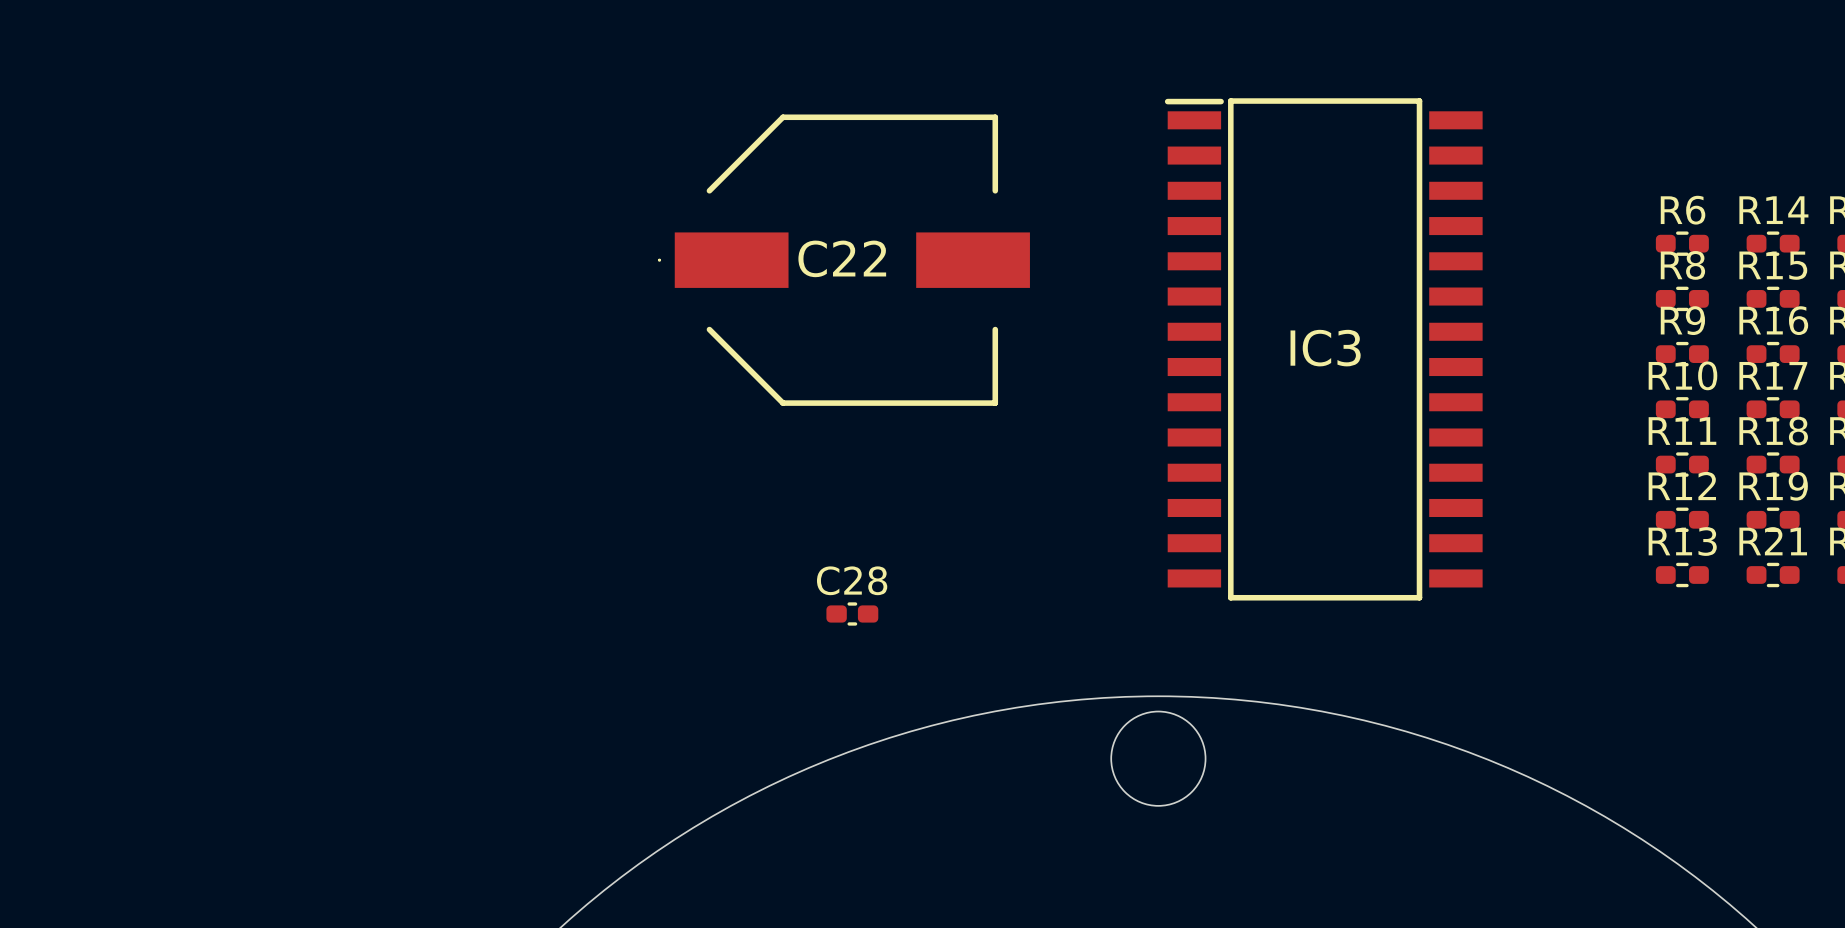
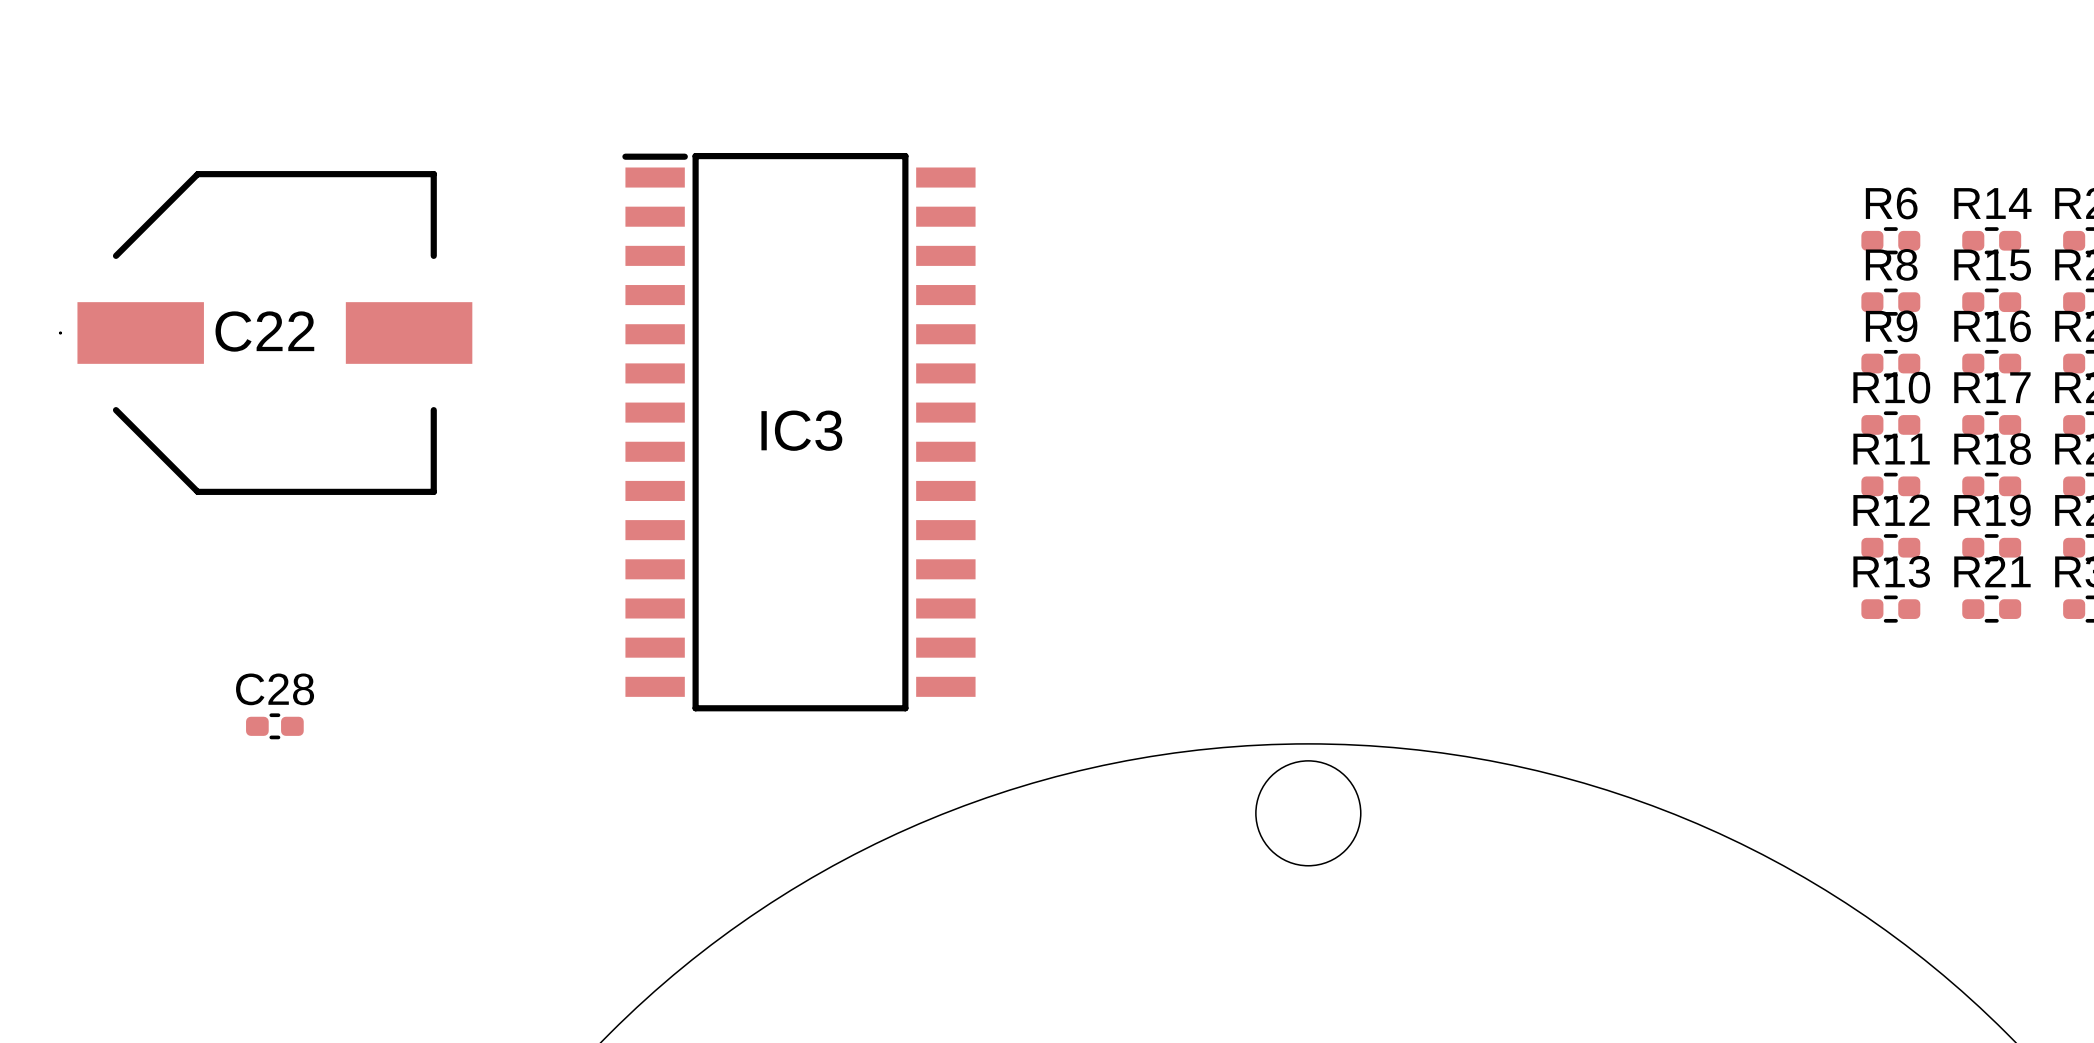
C22 position: (844, 260) -> (265, 333)
IC3 position: (1323, 349) -> (798, 432)
C28 position: (852, 613) -> (274, 726)

